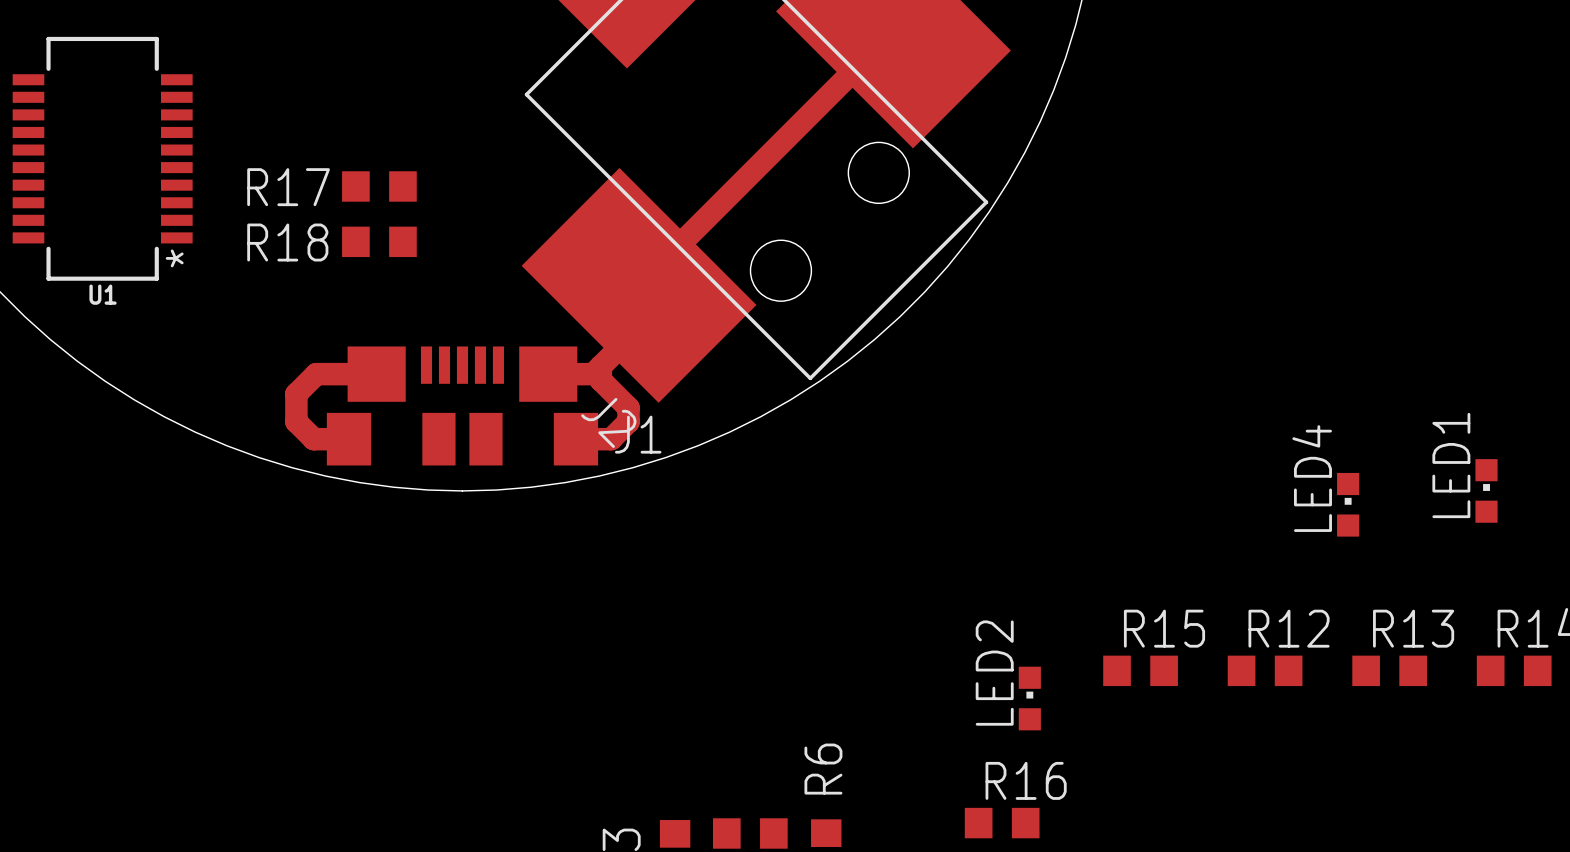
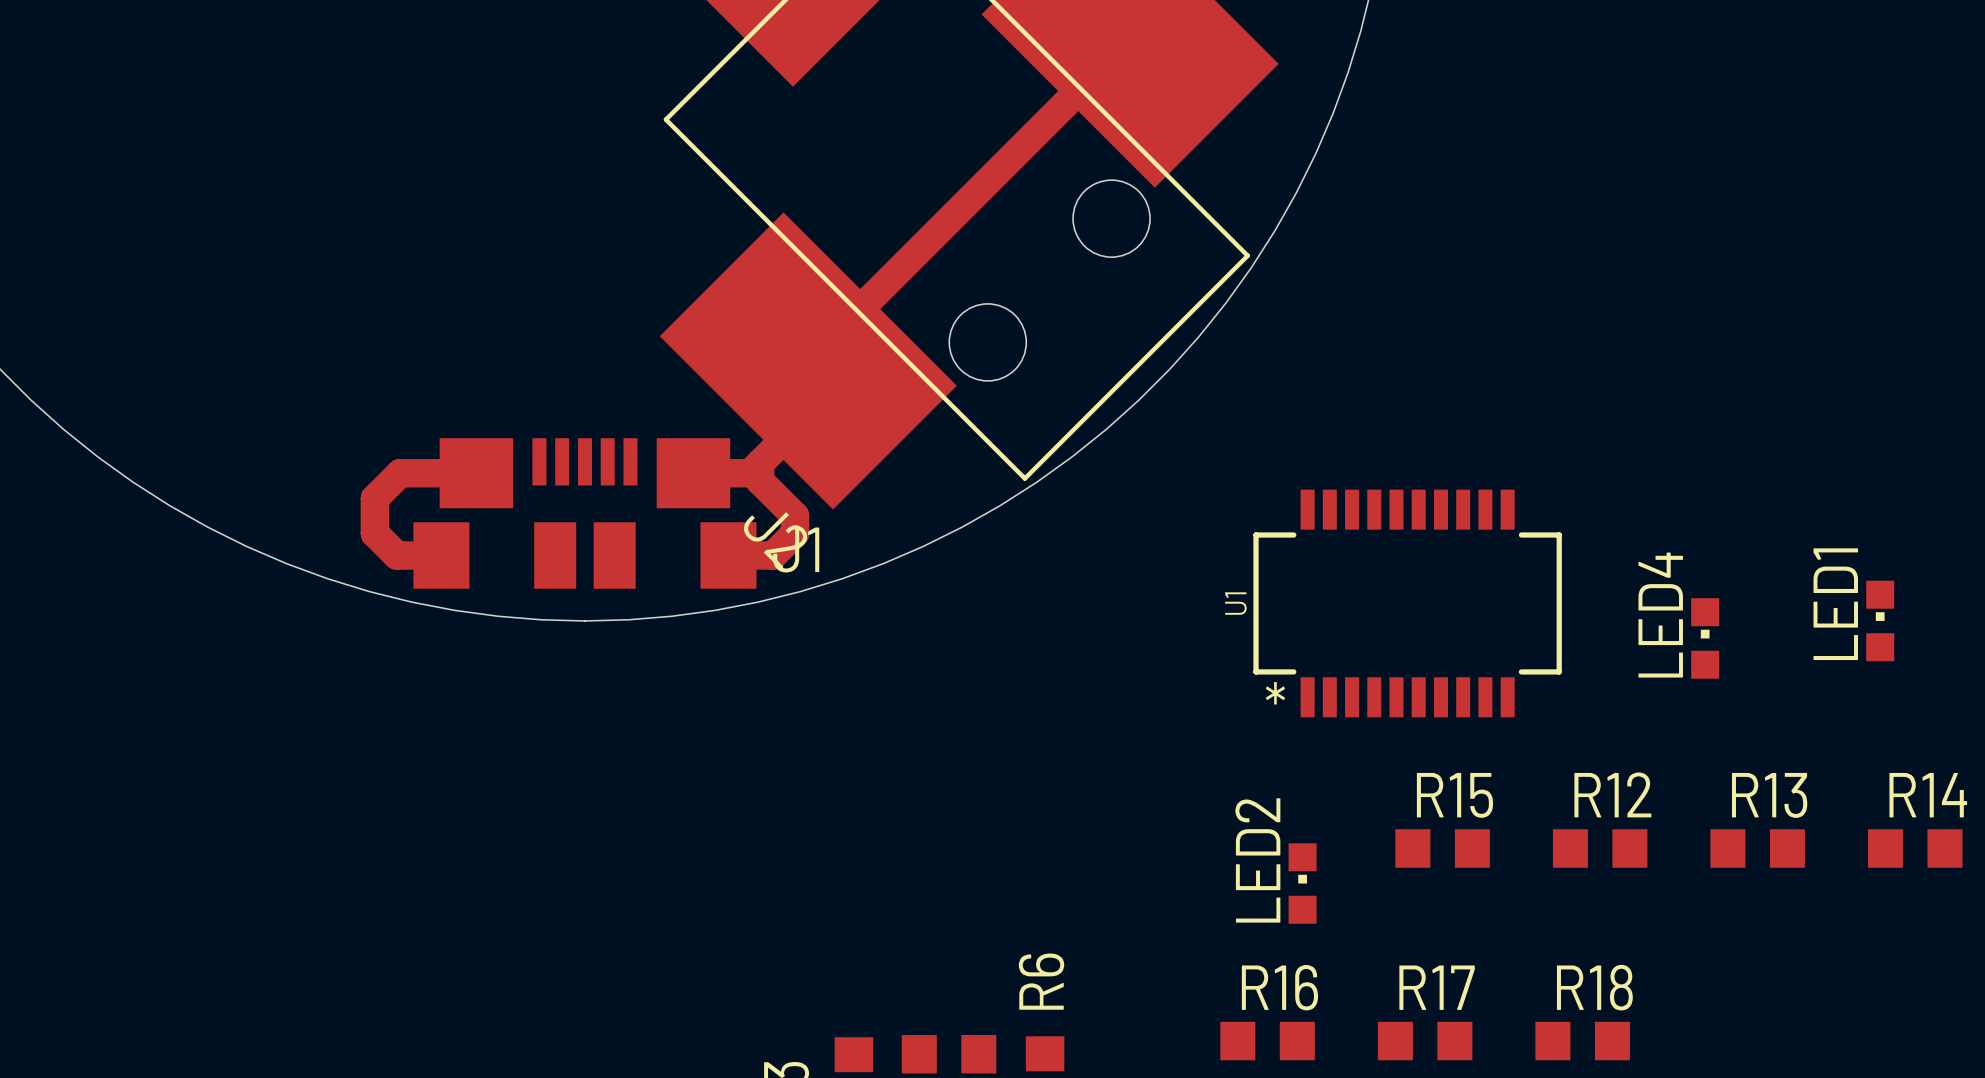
U1 rotation: 0° (102, 158) -> 90° clockwise (1407, 603)
U1 position: (102, 158) -> (1407, 603)
R17 position: (379, 186) -> (1425, 1041)
R17 name position: R17 (288, 187) -> R17 (1437, 987)
R18 position: (379, 241) -> (1582, 1041)
R18 name position: R18 (287, 242) -> R18 (1594, 987)

